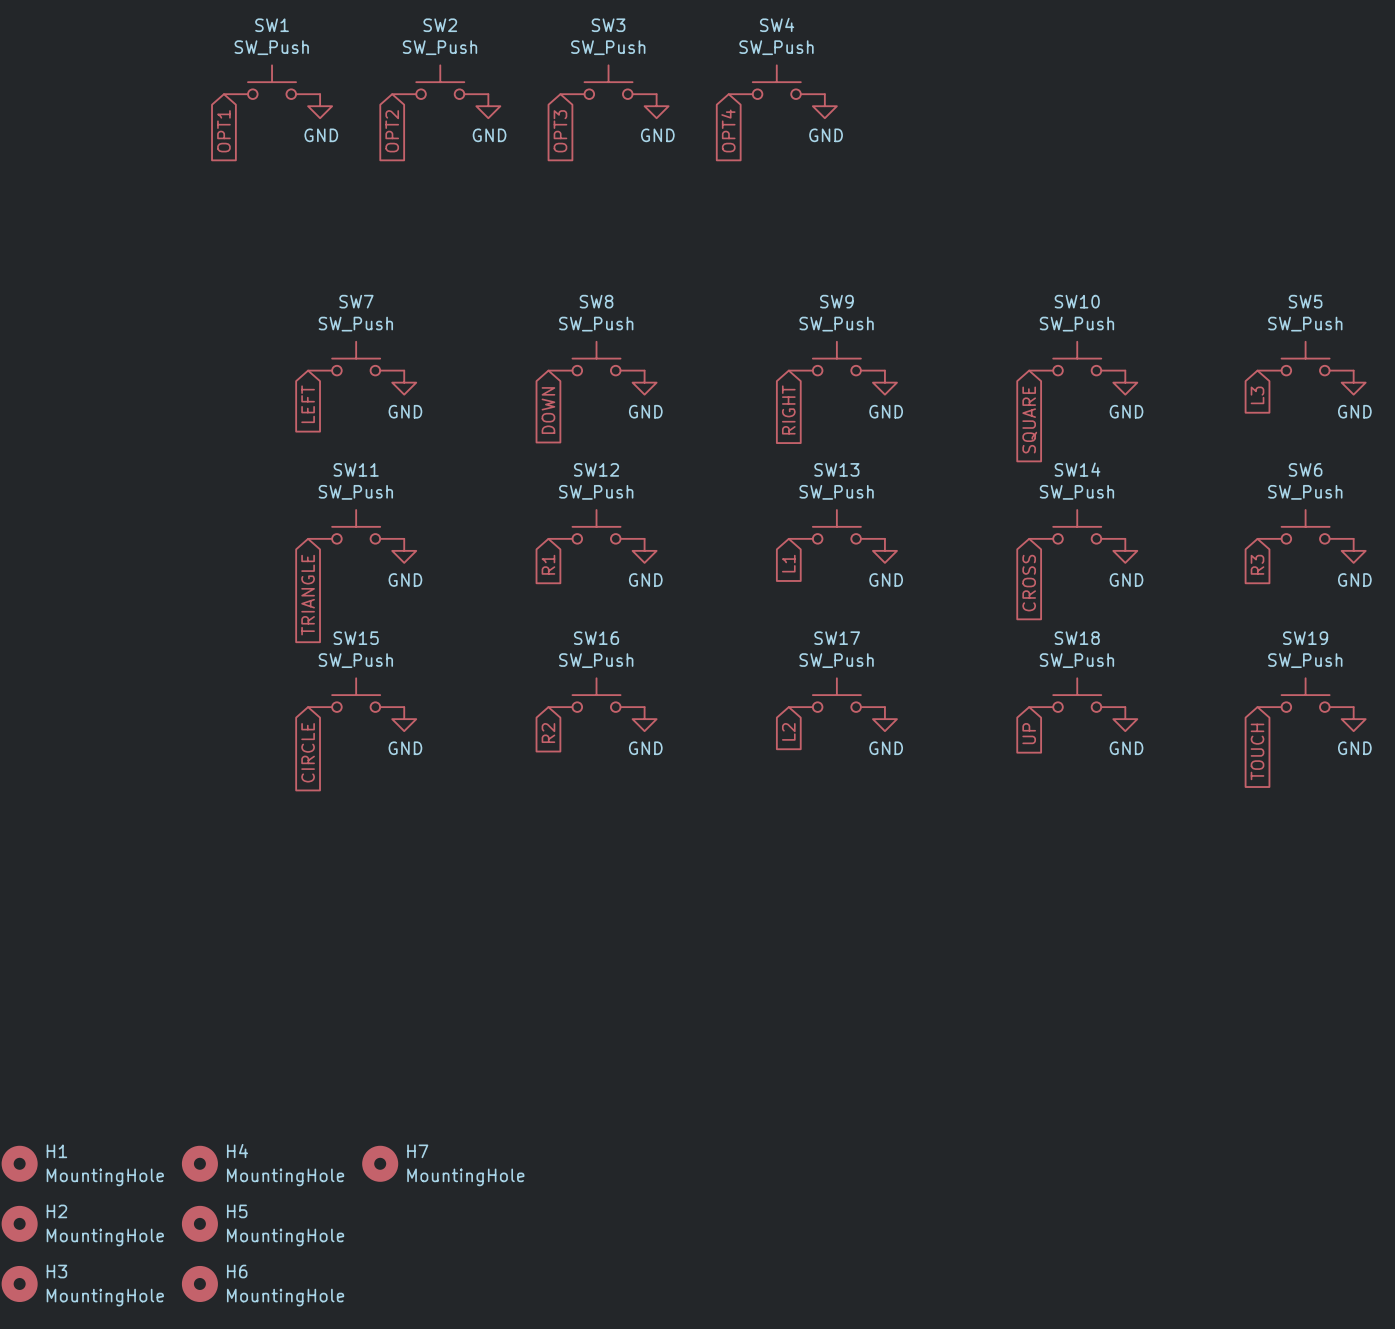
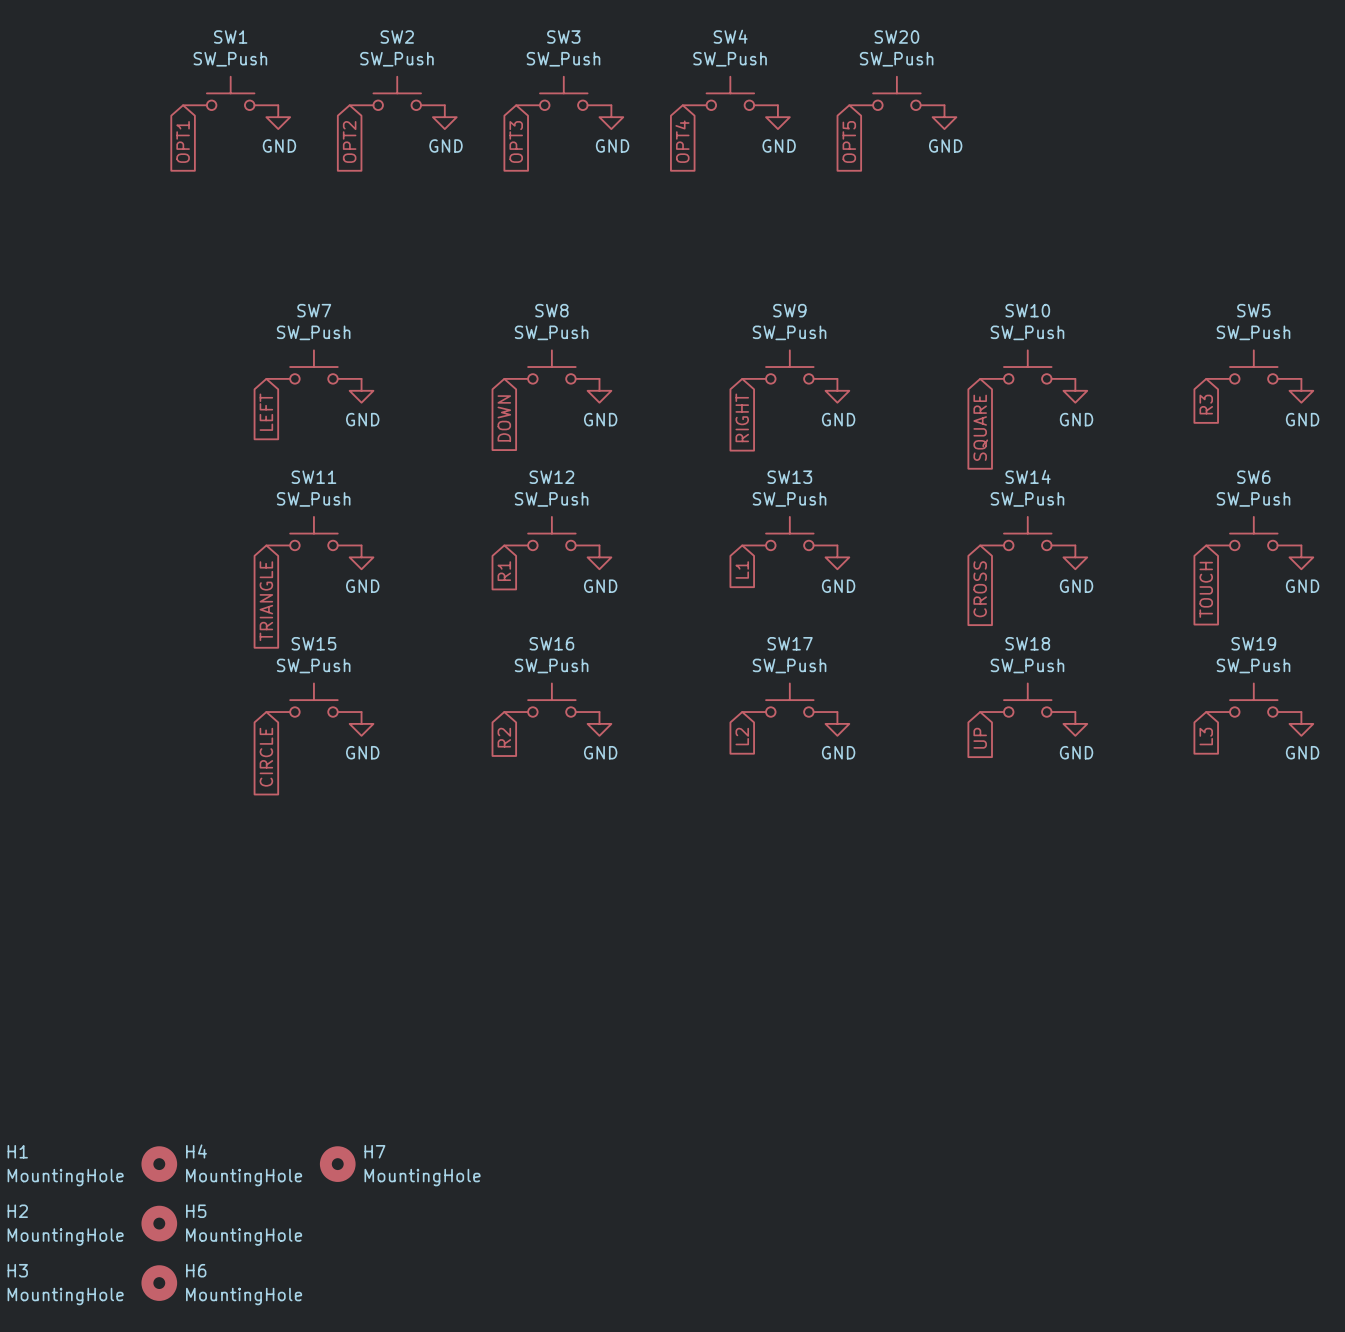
SW20: none -> SW_Push (896, 93)
power symbol: none -> GND (944, 117)
global label: none -> OPT5 (849, 141)
global label: L3 (1257, 395) -> R3 (1206, 404)
global label: R3 (1257, 564) -> TOUCH (1206, 589)
global label: TOUCH (1257, 751) -> L3 (1206, 736)

